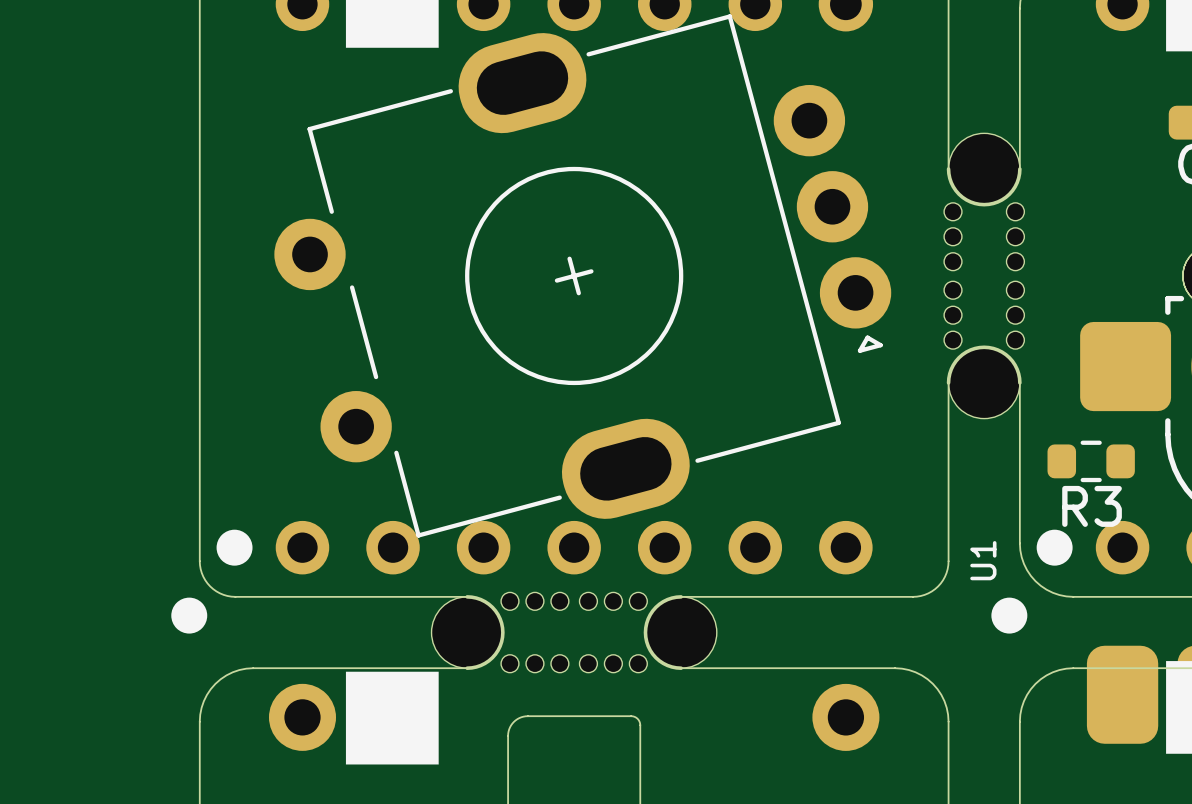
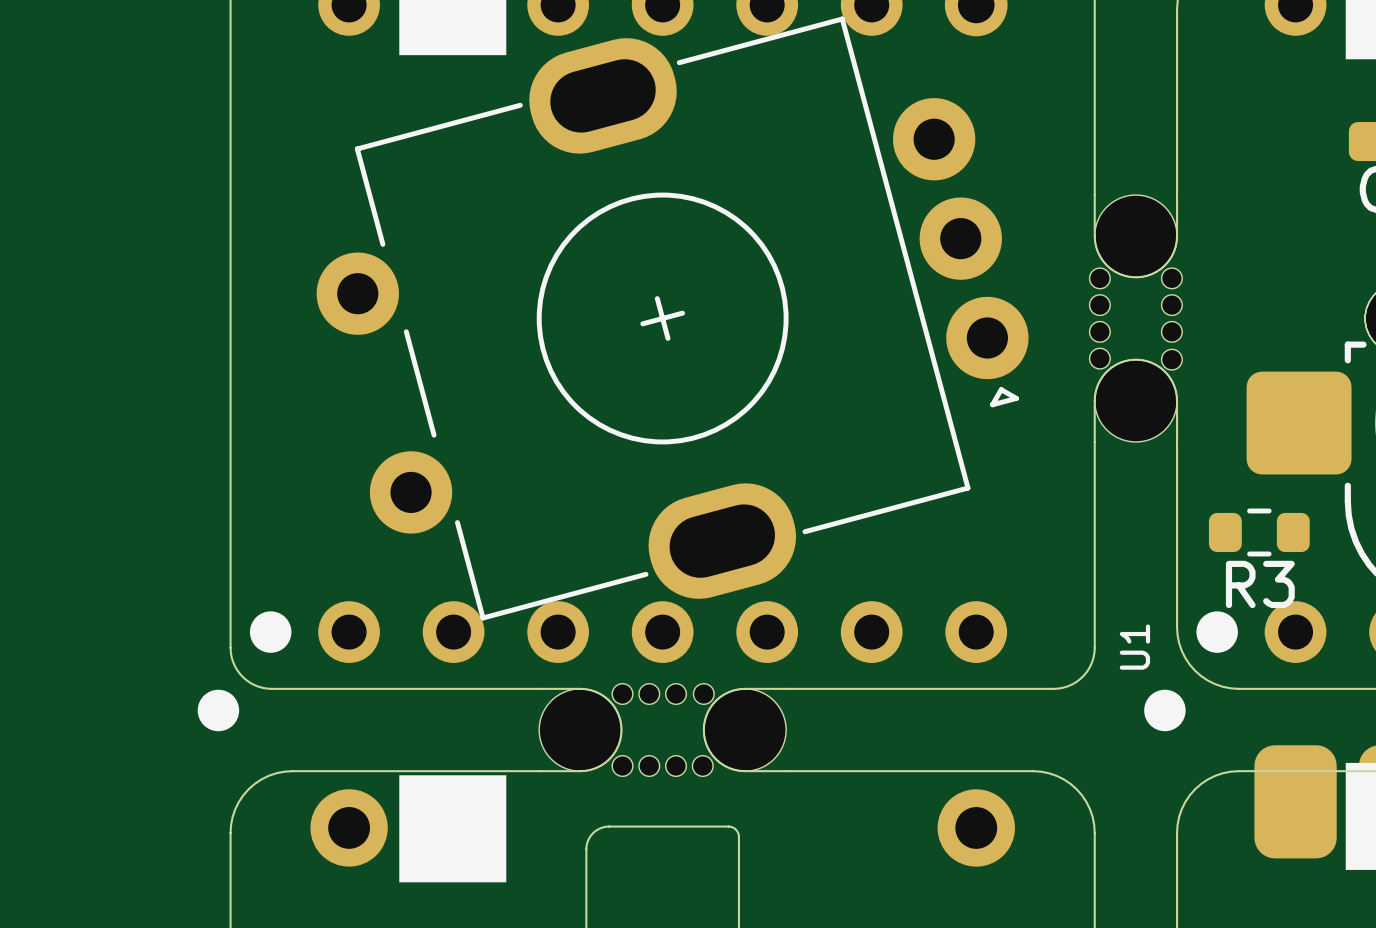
part footprint: [944, 133, 1025, 419] -> [1089, 194, 1183, 443]
part footprint: [431, 592, 717, 673] -> [538, 683, 788, 777]

